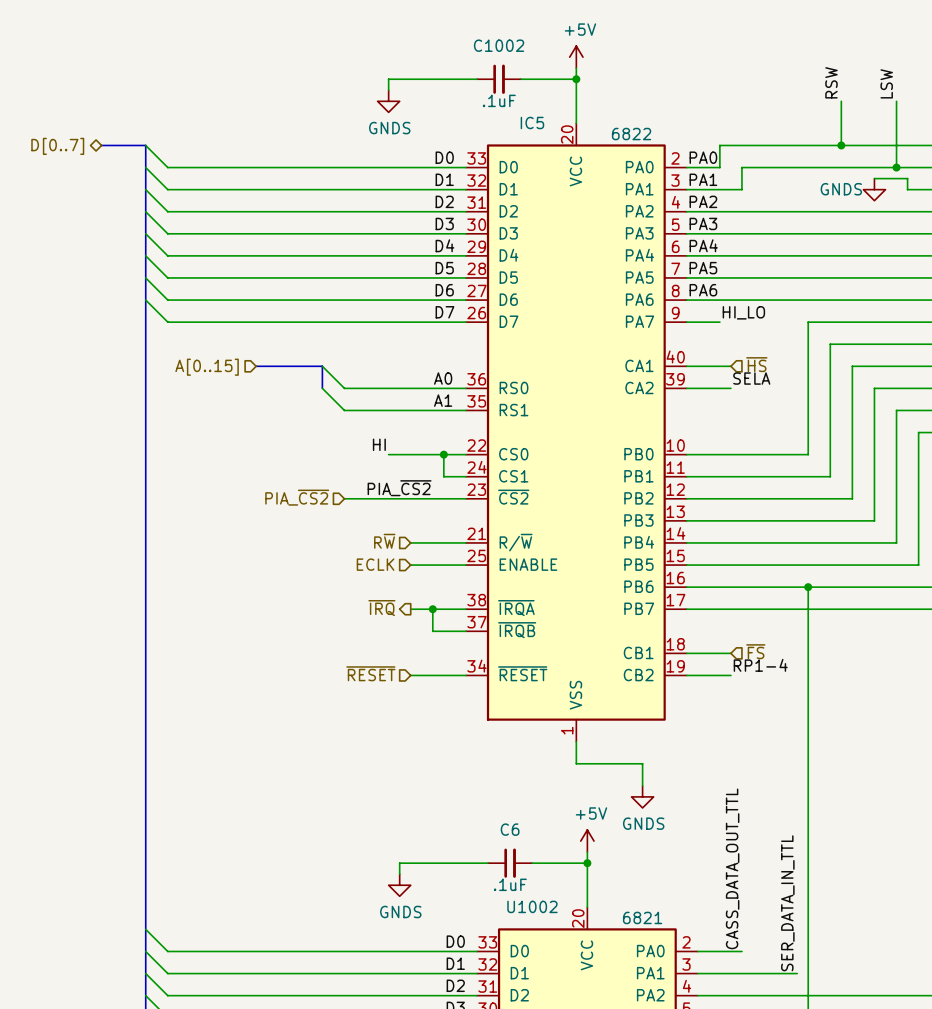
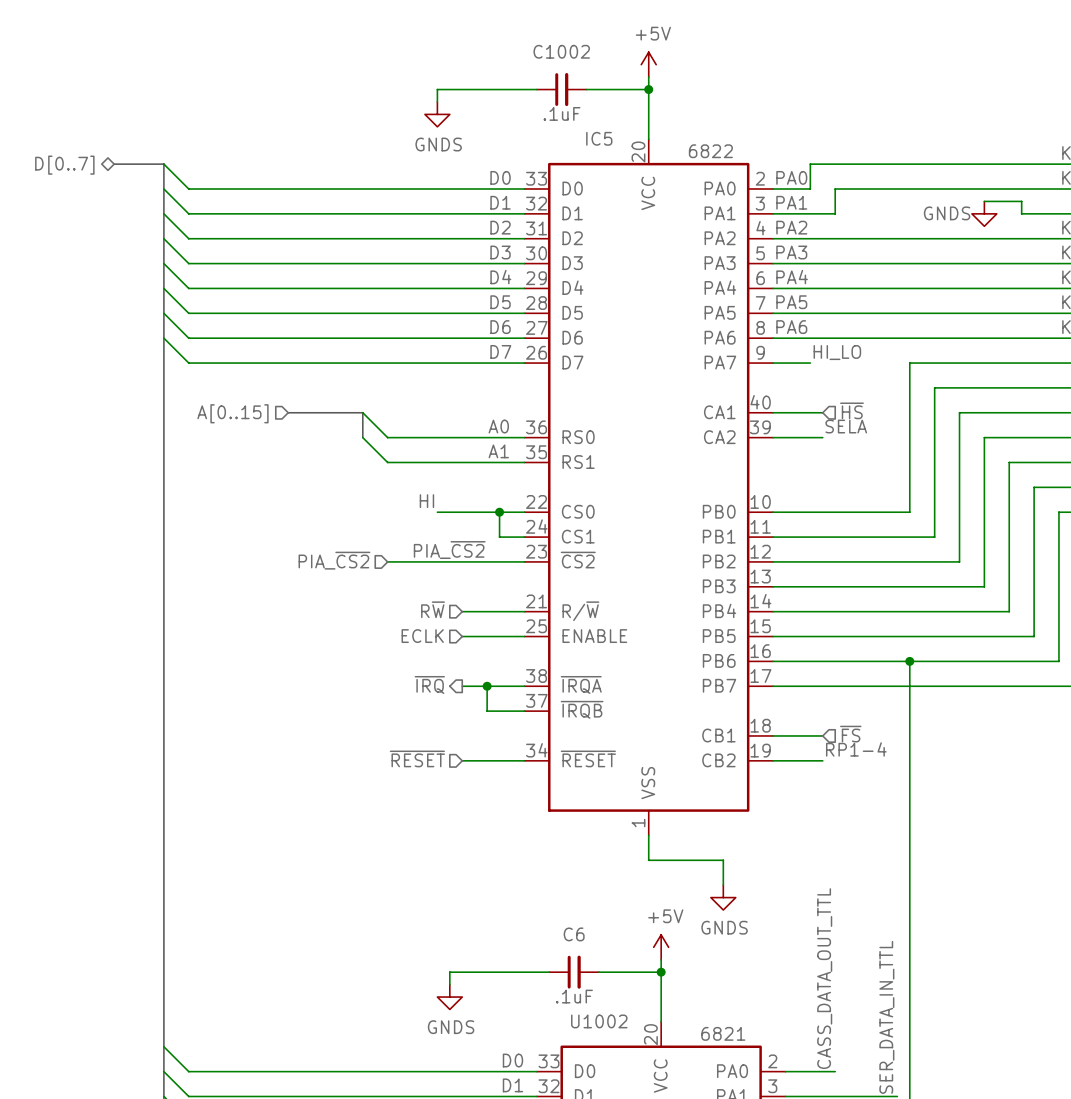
label: RSW (831, 82) -> none
label: LSW (886, 83) -> none
wire: (841, 101) (841, 145) -> none
wire: (896, 101) (896, 167) -> none
junction: (841, 145) -> none
junction: (896, 167) -> none

